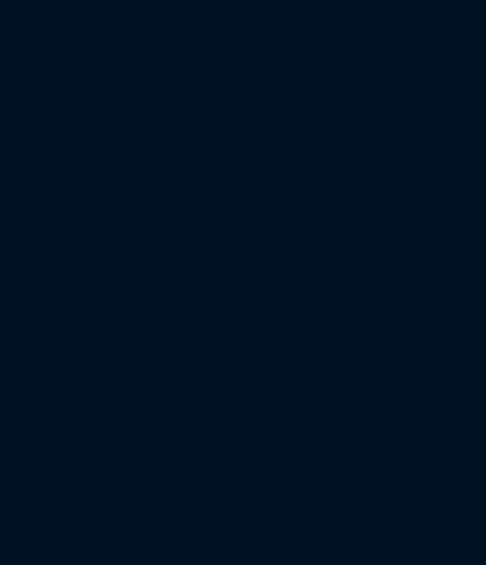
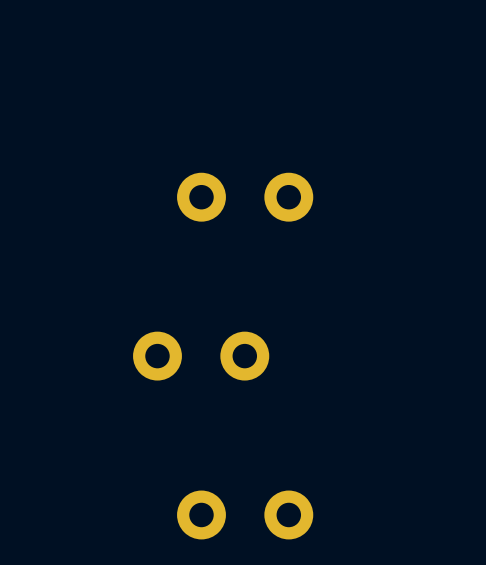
part: none -> (245, 197)
part: none -> (201, 356)
part: none -> (245, 514)

